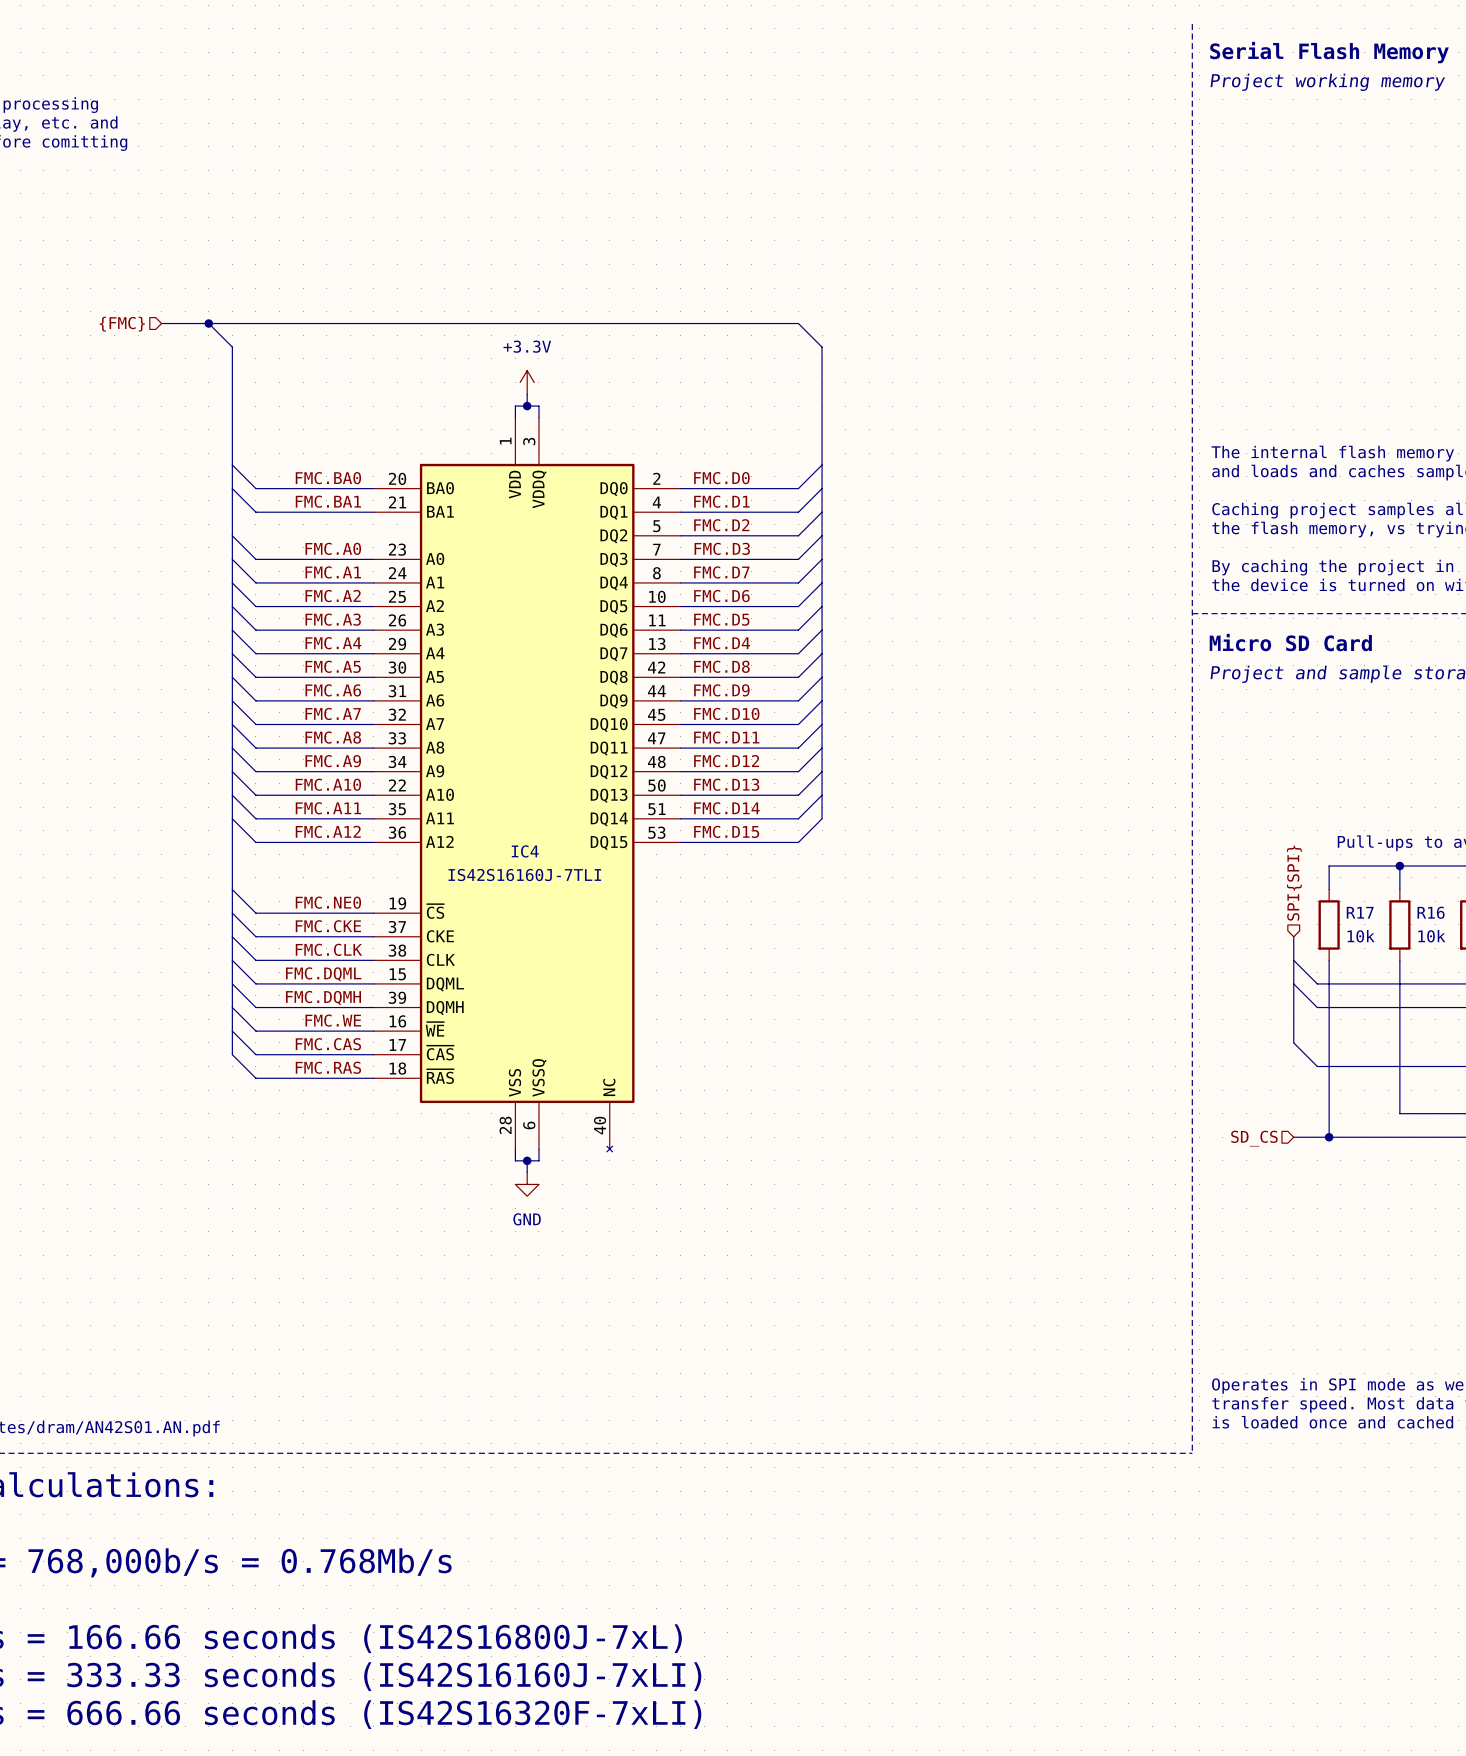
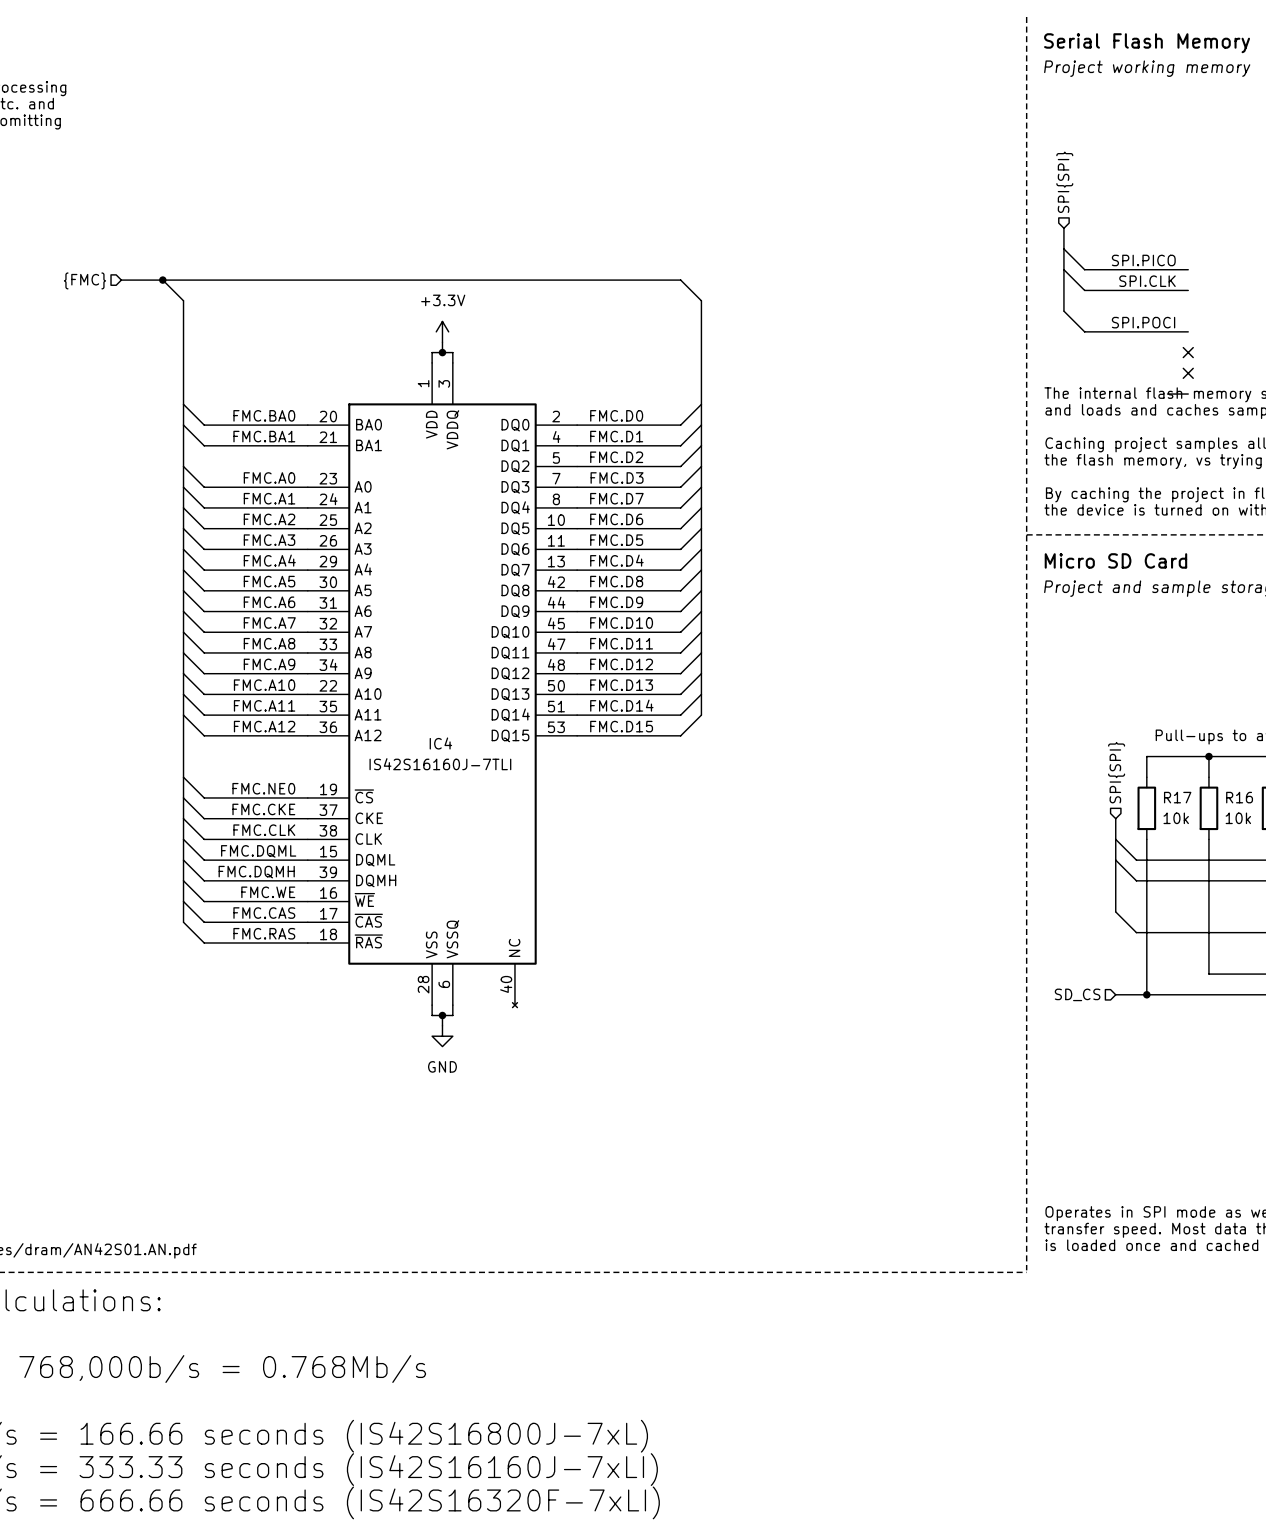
hierarchical label: none -> SPI{SPI} (1064, 182)
bus: none -> (1063, 228) (1063, 311)
wire: none -> (1063, 249) (1084, 269) (1188, 269)
label: none -> SPI.PICO (1143, 260)
wire: none -> (1063, 269) (1084, 290) (1188, 290)
label: none -> SPI.CLK (1147, 281)
wire: none -> (1063, 311) (1084, 331) (1188, 331)
label: none -> SPI.POCI (1143, 322)
no-connect mark: none -> (1188, 352)
no-connect mark: none -> (1188, 373)
wire: none -> (1167, 394) (1188, 394)

